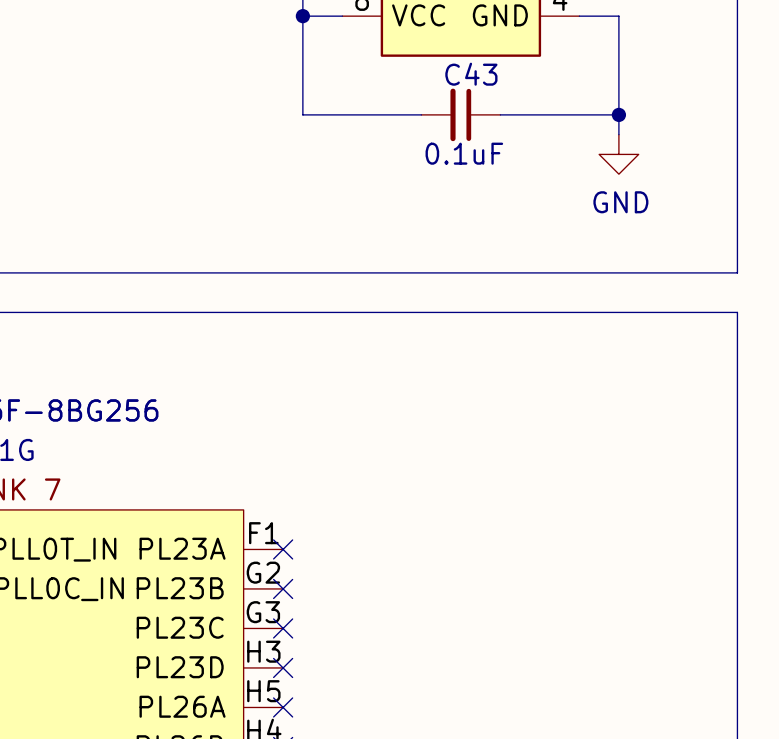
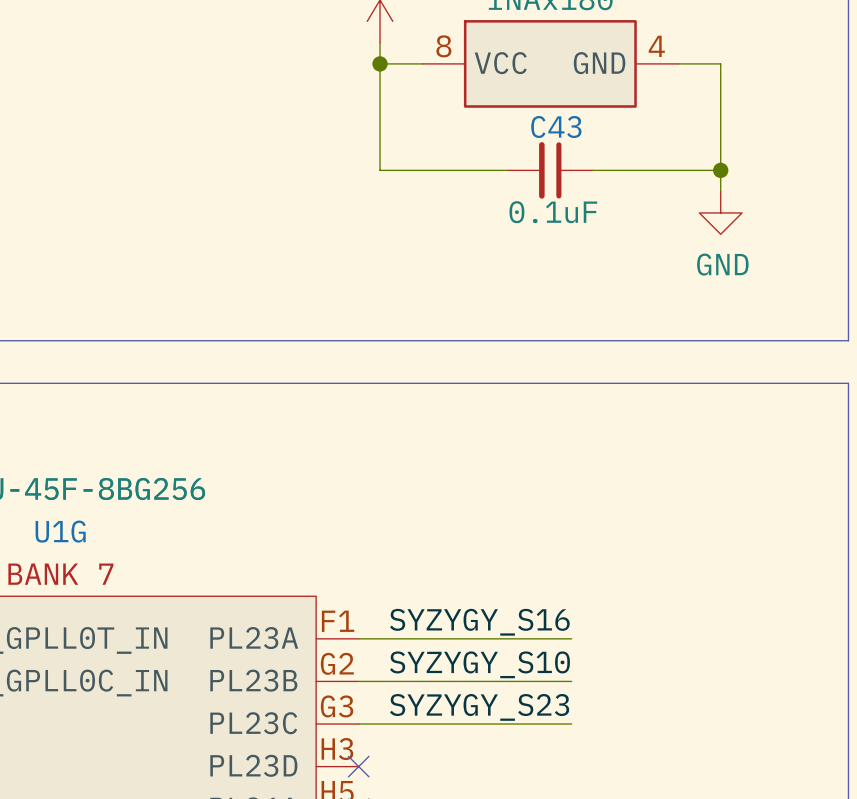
label: none -> SYZYGY_S16 (479, 622)
wire: none -> (358, 638) (571, 638)
no-connect mark: (283, 549) -> none
label: none -> SYZYGY_S10 (479, 664)
wire: none -> (358, 681) (571, 681)
no-connect mark: (283, 588) -> none
label: none -> SYZYGY_S23 (479, 707)
wire: none -> (358, 724) (571, 724)
no-connect mark: (283, 628) -> none

